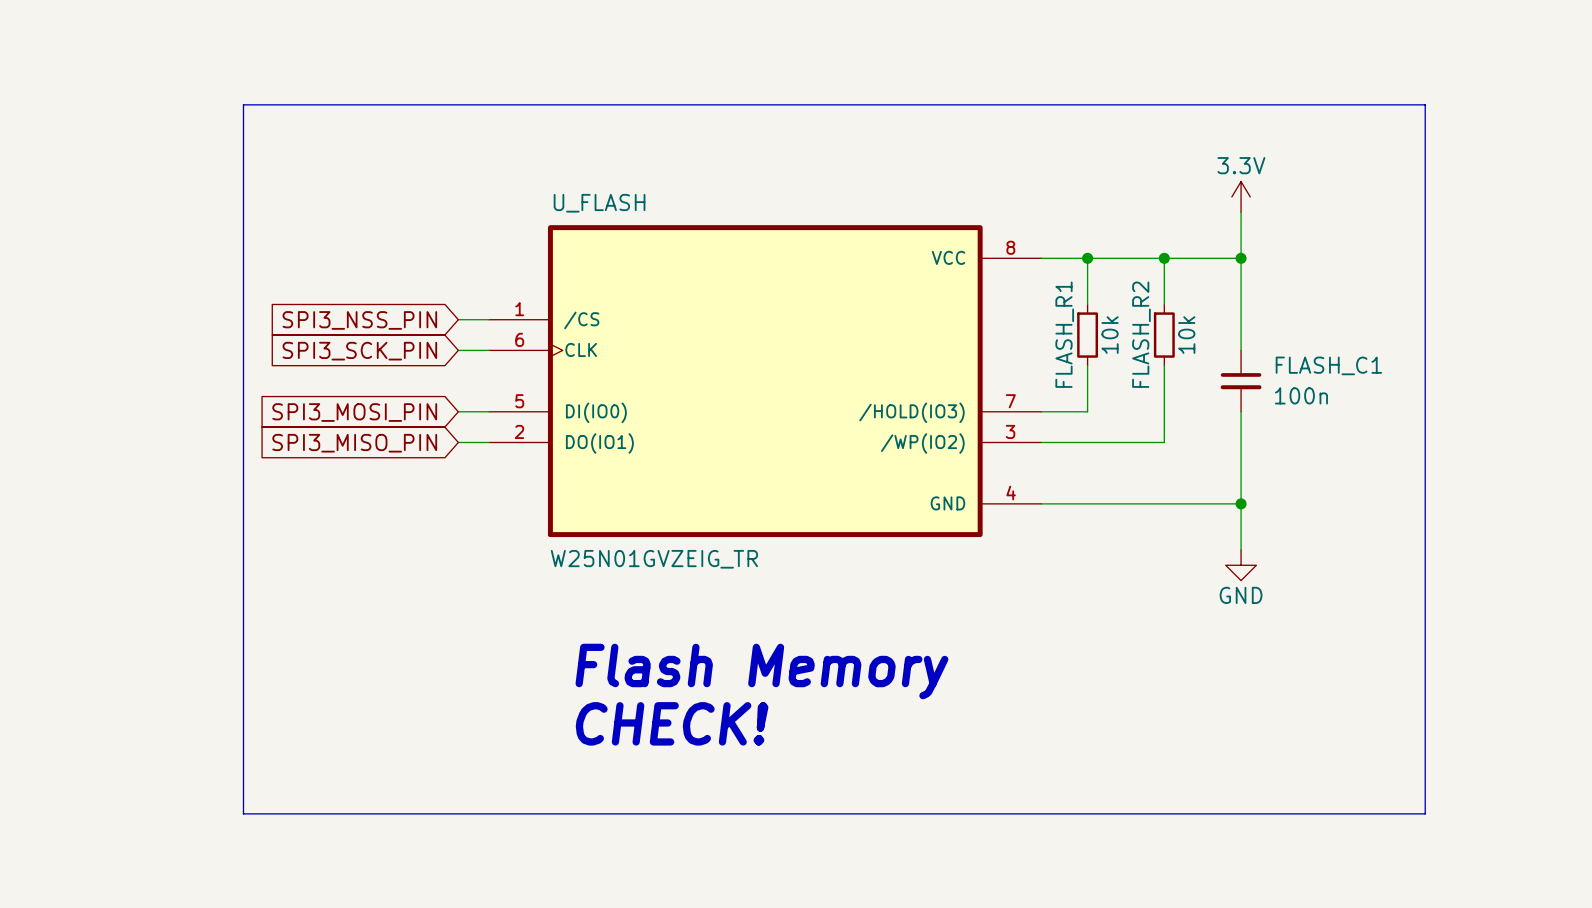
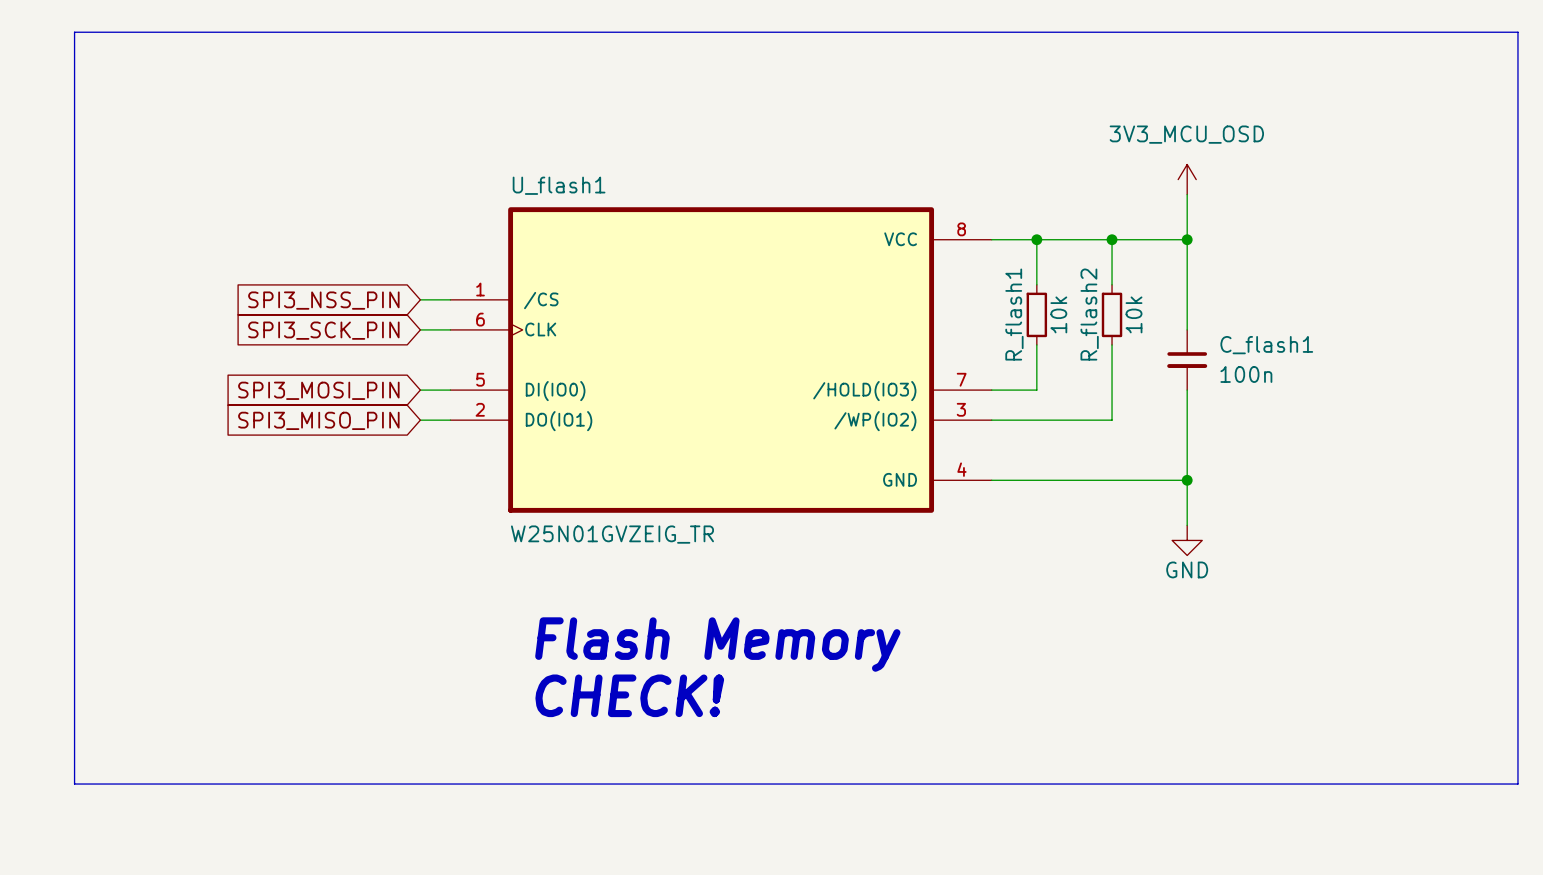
power symbol: 3.3V (1241, 196) -> 3V3_MCU_OSD (1187, 179)
U_FLASH name: U_FLASH (599, 203) -> U_flash1 (559, 185)
FLASH_R1 name: FLASH_R1 (1064, 334) -> R_flash1 (1014, 314)
FLASH_R2 name: FLASH_R2 (1141, 334) -> R_flash2 (1089, 314)
FLASH_C1 name: FLASH_C1 (1328, 365) -> C_flash1 (1266, 345)
line: (243, 813) (243, 104) (1425, 104) (1425, 813) -> (209, 784) (74, 784) (74, 32) (1517, 32) (1517, 784) (1367, 784)

